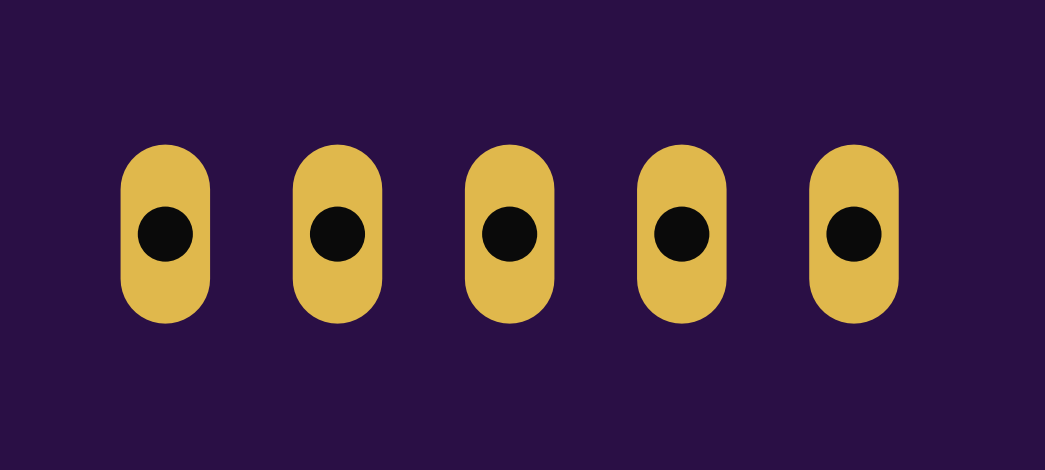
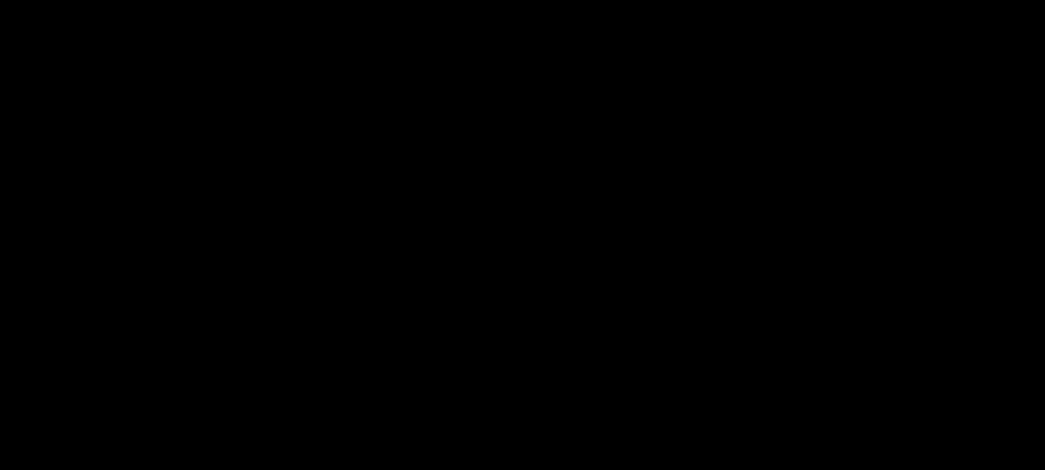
part: (509, 234) -> none

